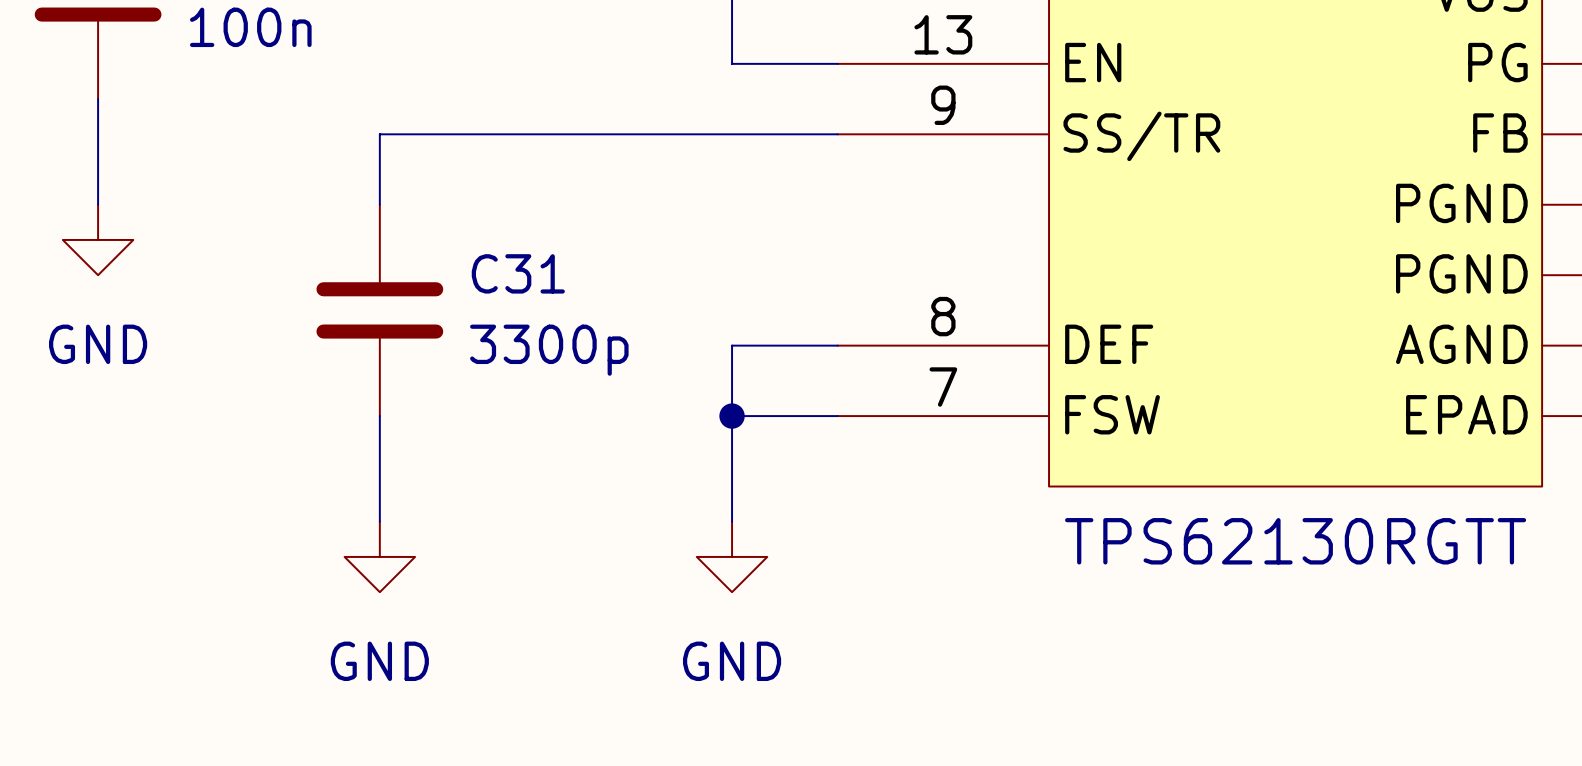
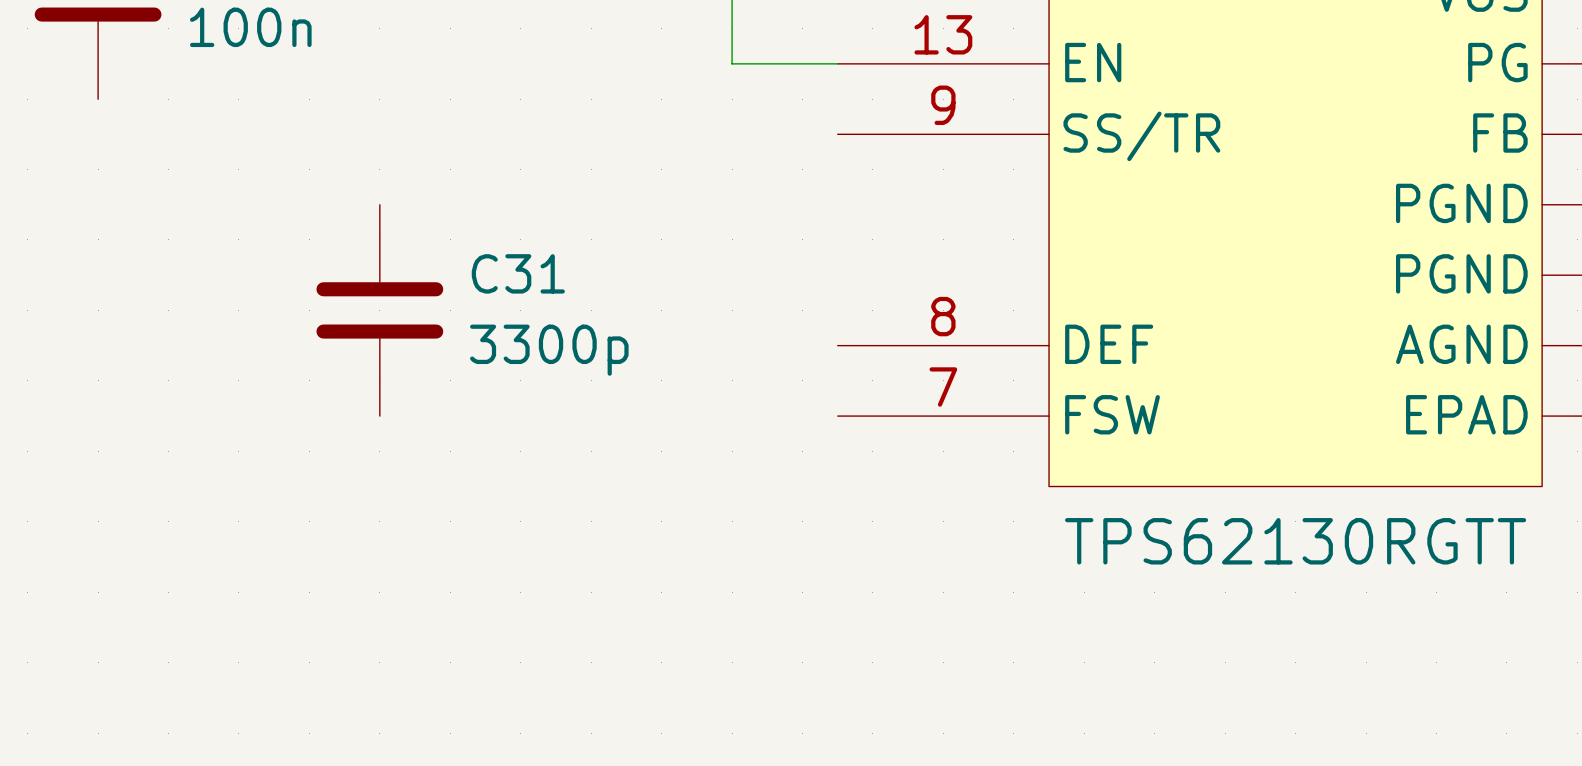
wire: (98, 99) (98, 204) -> none
wire: (837, 134) (379, 134) (379, 204) -> none
power symbol: GND (98, 239) -> none
wire: (837, 345) (732, 345) (732, 521) -> none
wire: (379, 416) (379, 521) -> none
wire: (732, 416) (837, 416) -> none
junction: (732, 416) -> none
power symbol: GND (379, 556) -> none
power symbol: GND (732, 556) -> none

